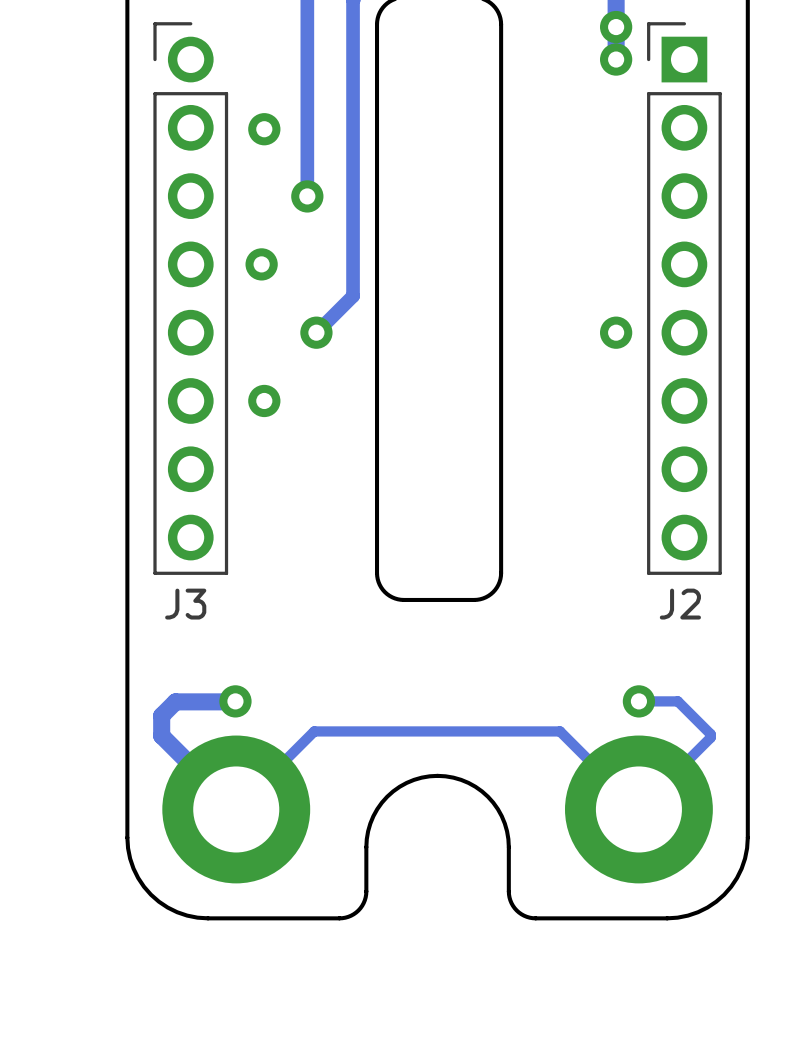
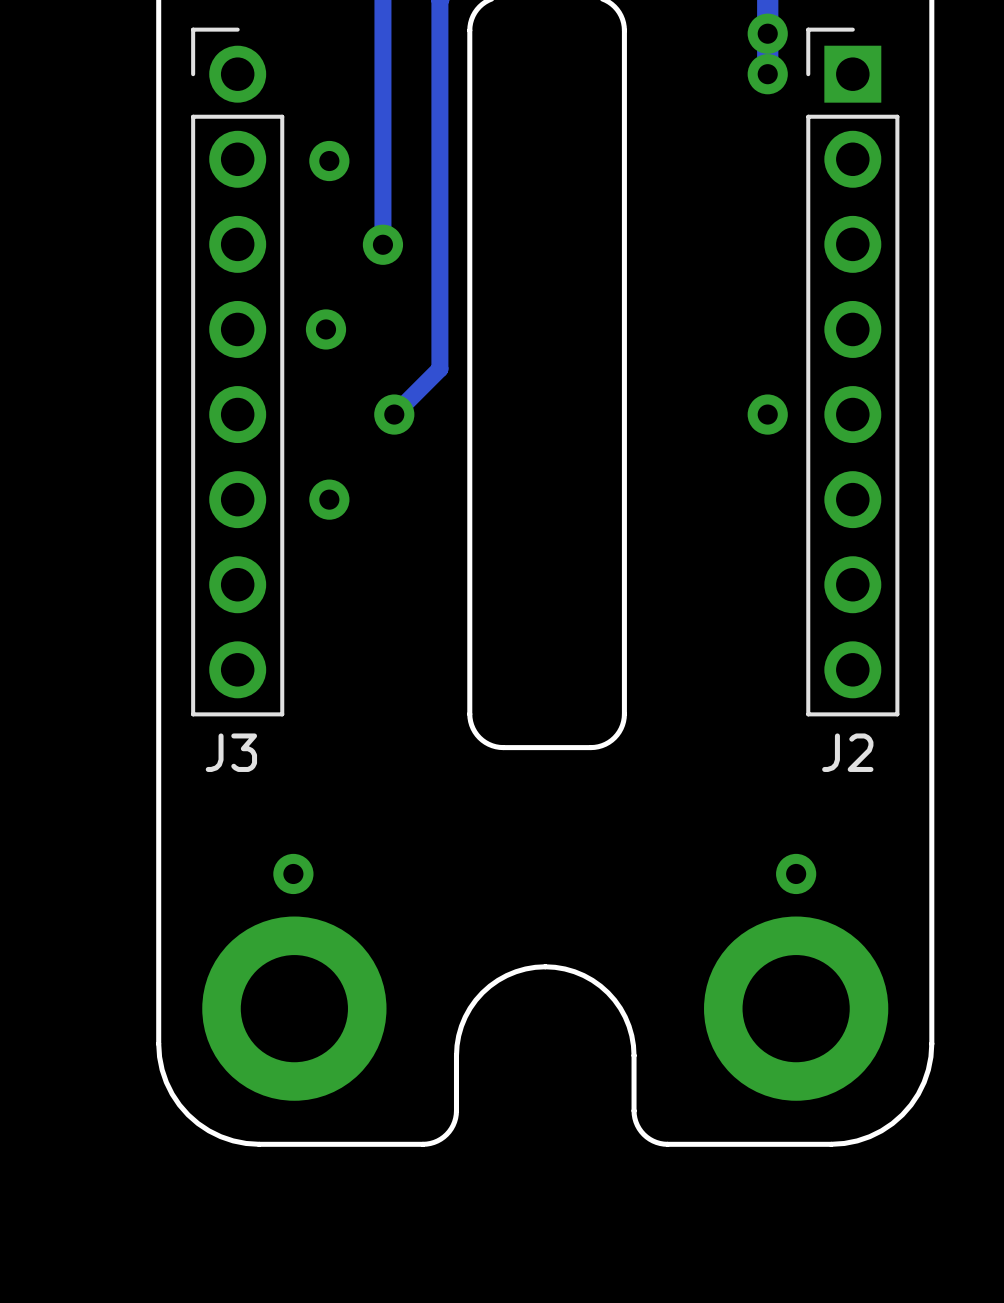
track: (234, 701) (175, 701) (161, 715) (161, 735) (235, 809) -> none
track: (638, 701) (677, 701) (710, 734) (710, 737) (638, 809) (560, 731) (314, 731) (236, 809) -> none

